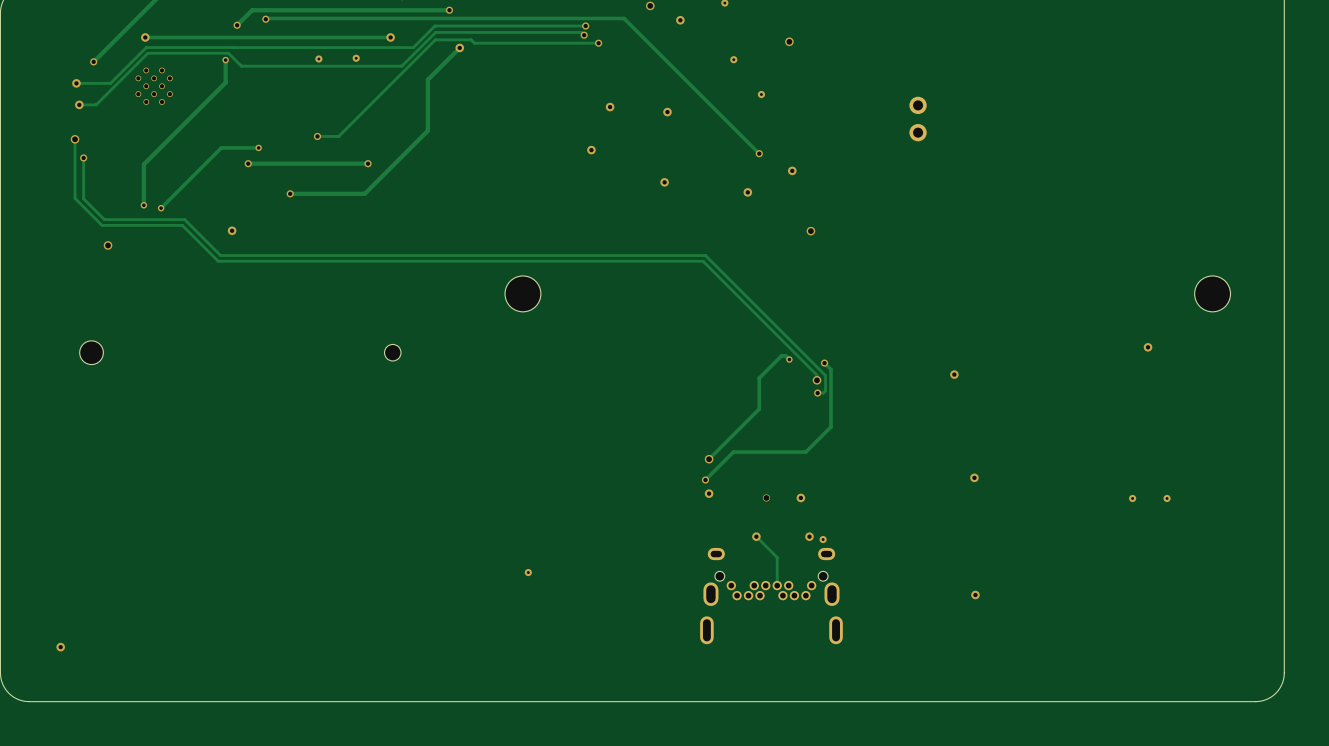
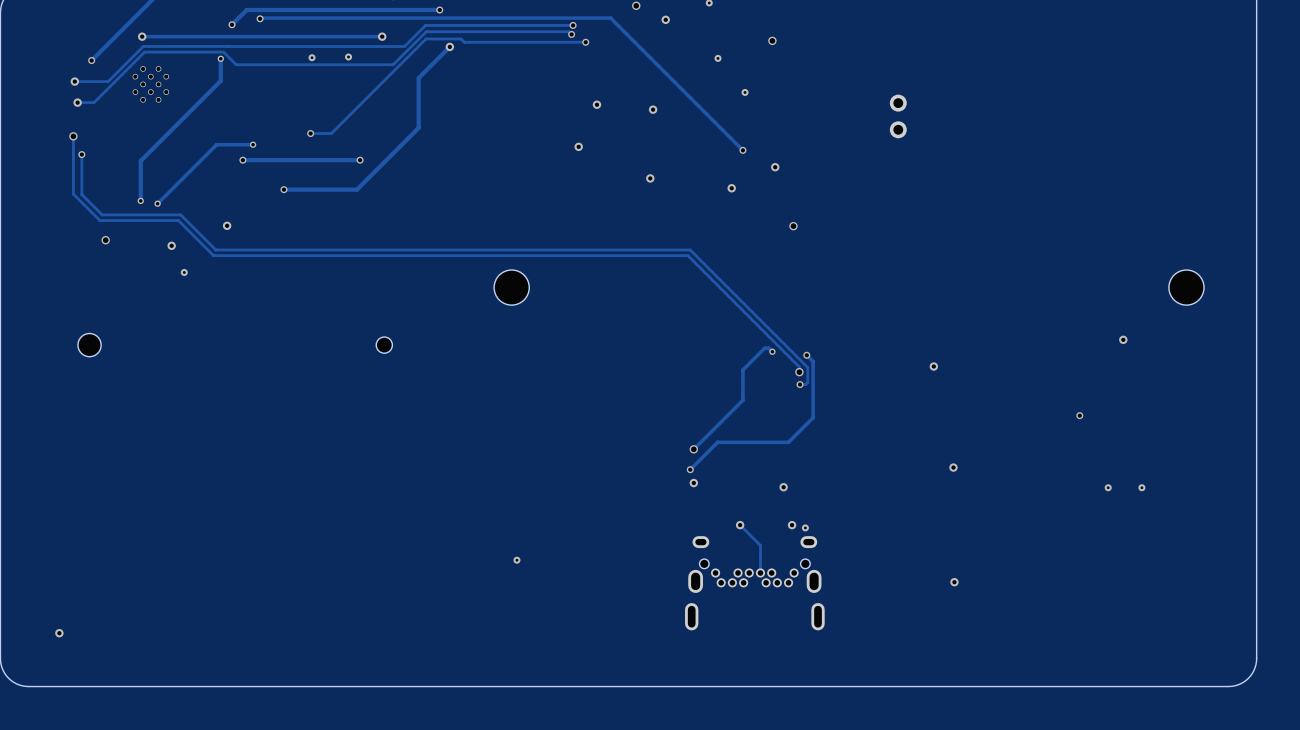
via: none -> (171, 245)
via: none -> (184, 272)
via: none -> (1079, 415)
via: (766, 497) -> none

